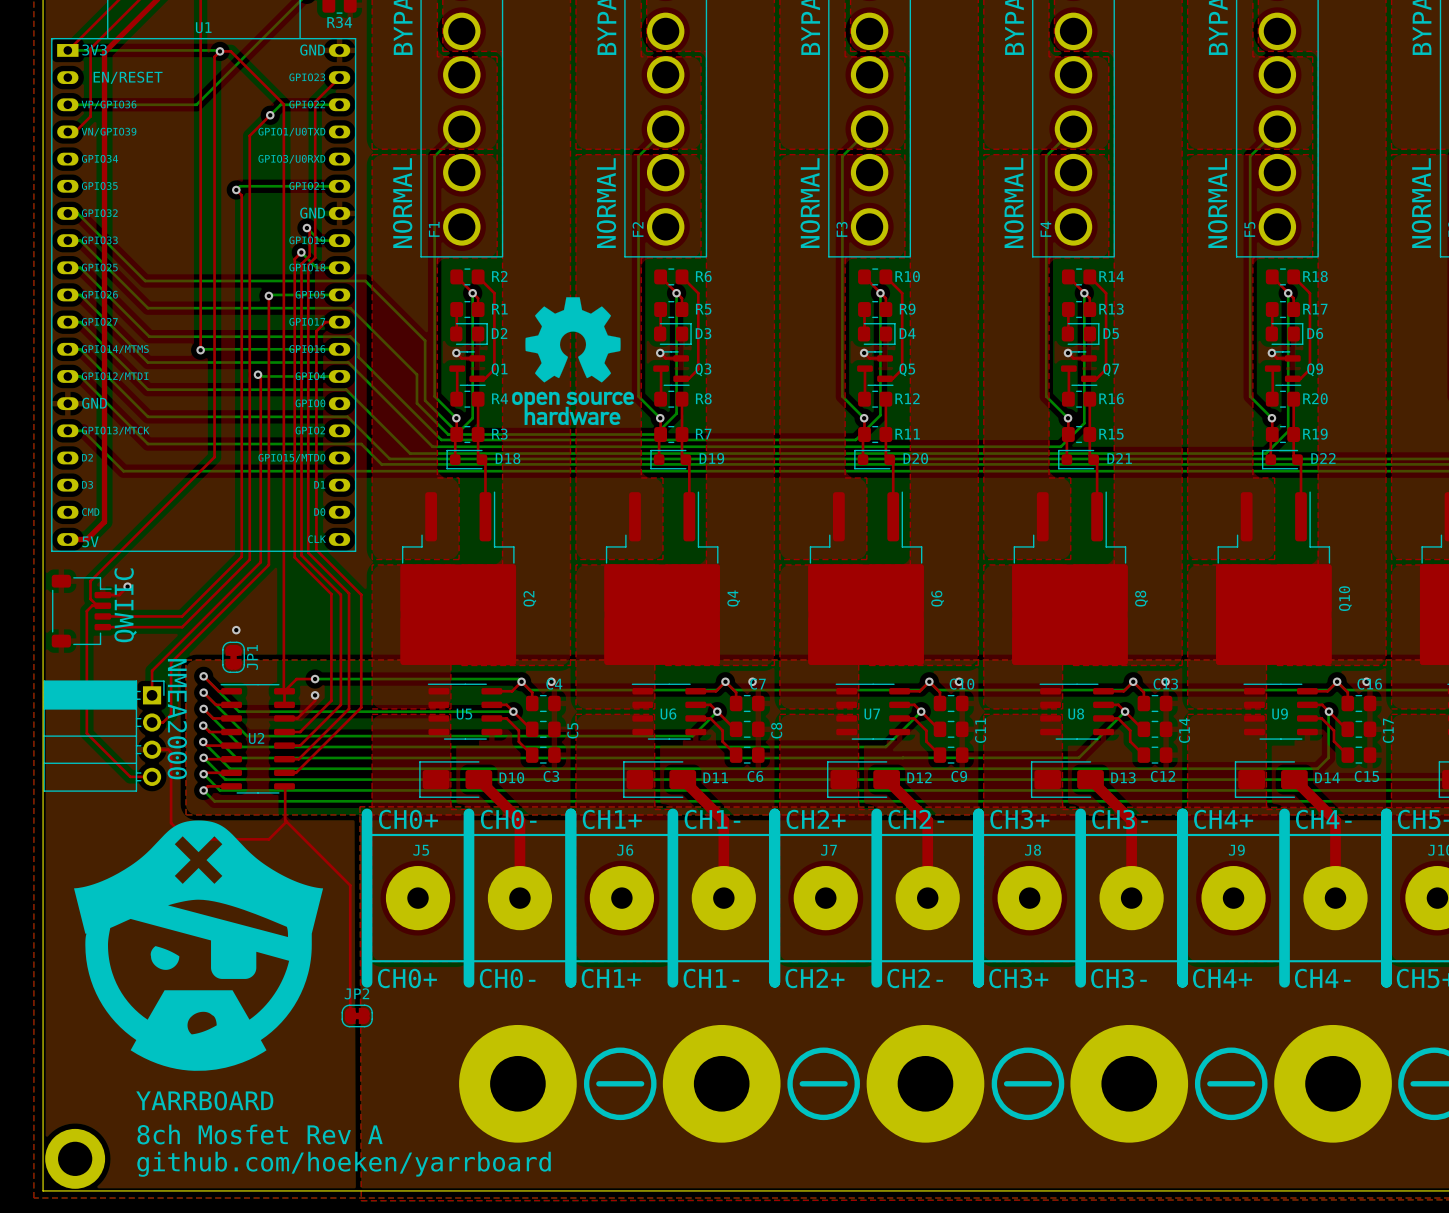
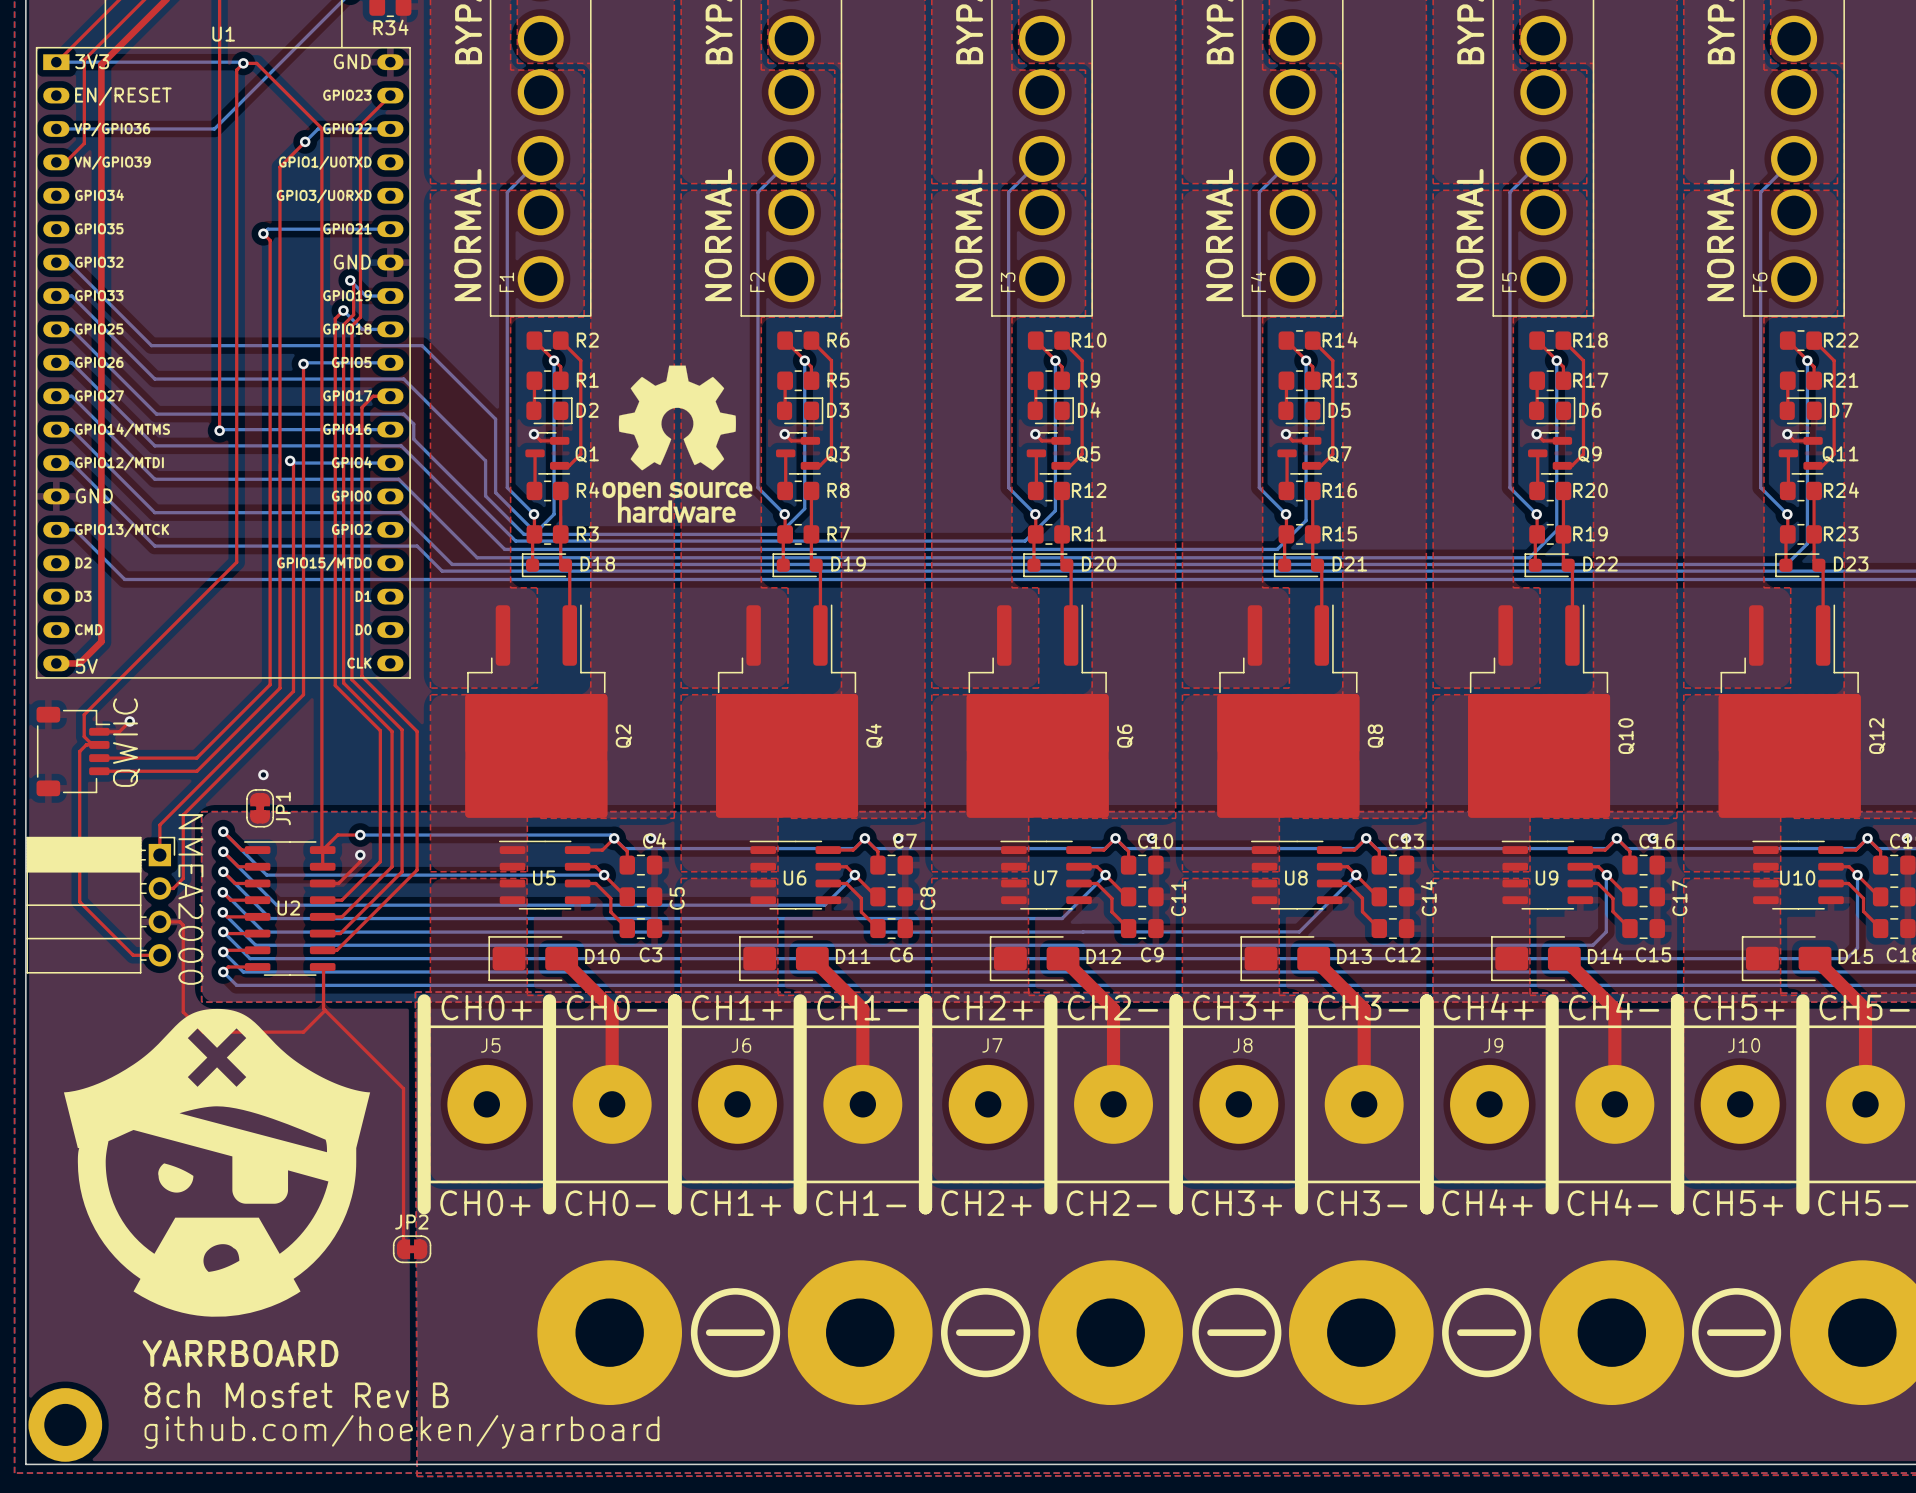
text: 8ch Mosfet Rev A (260, 1134) -> 8ch Mosfet Rev B (296, 1395)

